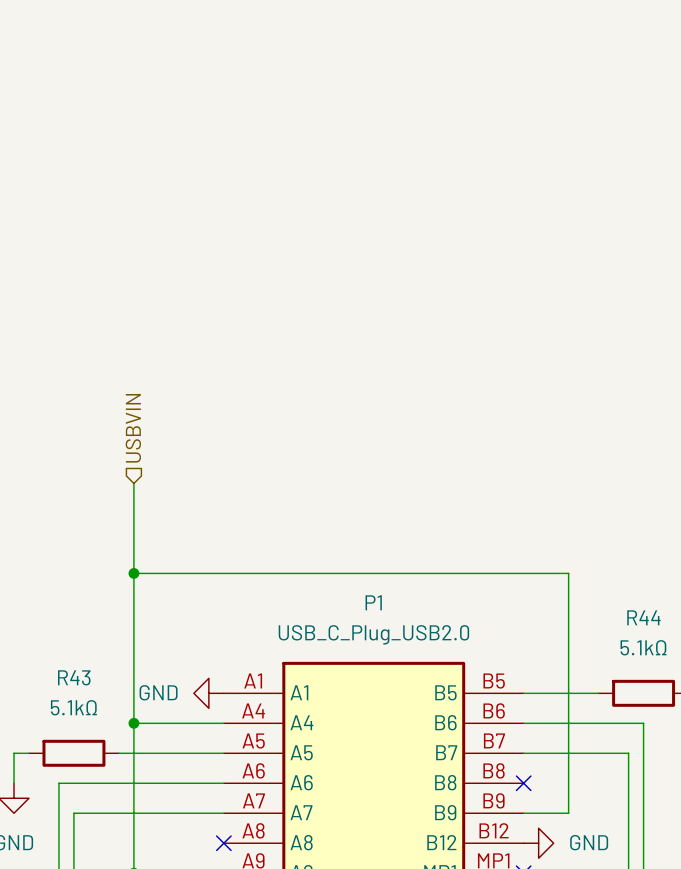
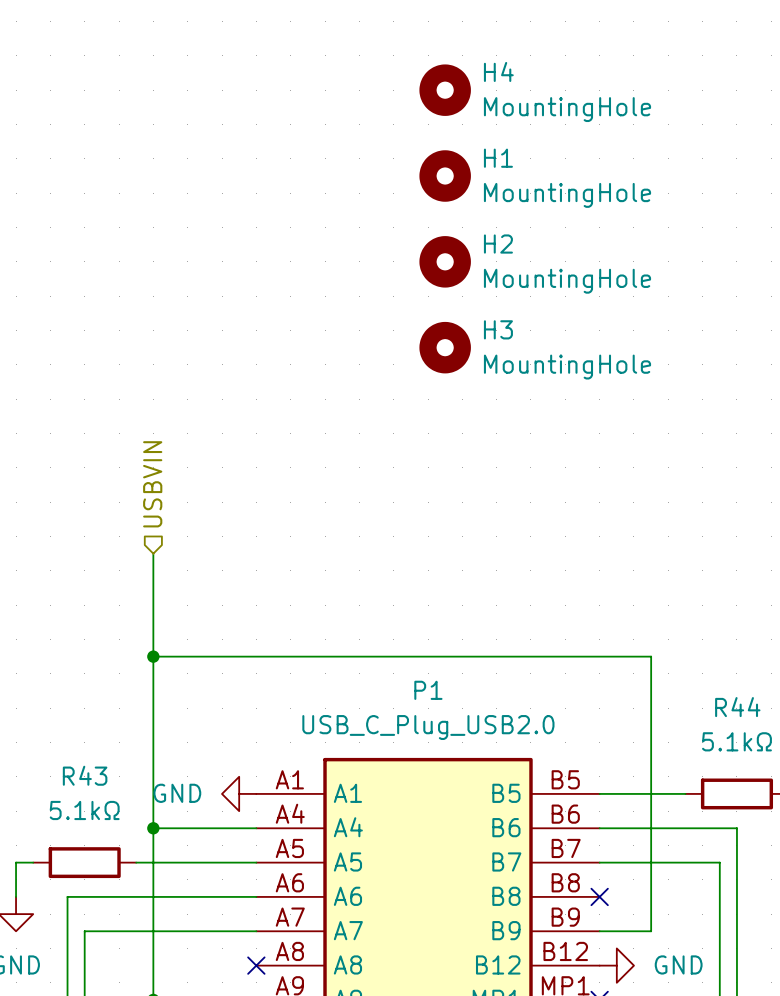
H4: none -> MountingHole (445, 90)
H1: none -> MountingHole (445, 176)
H2: none -> MountingHole (445, 261)
H3: none -> MountingHole (445, 347)

